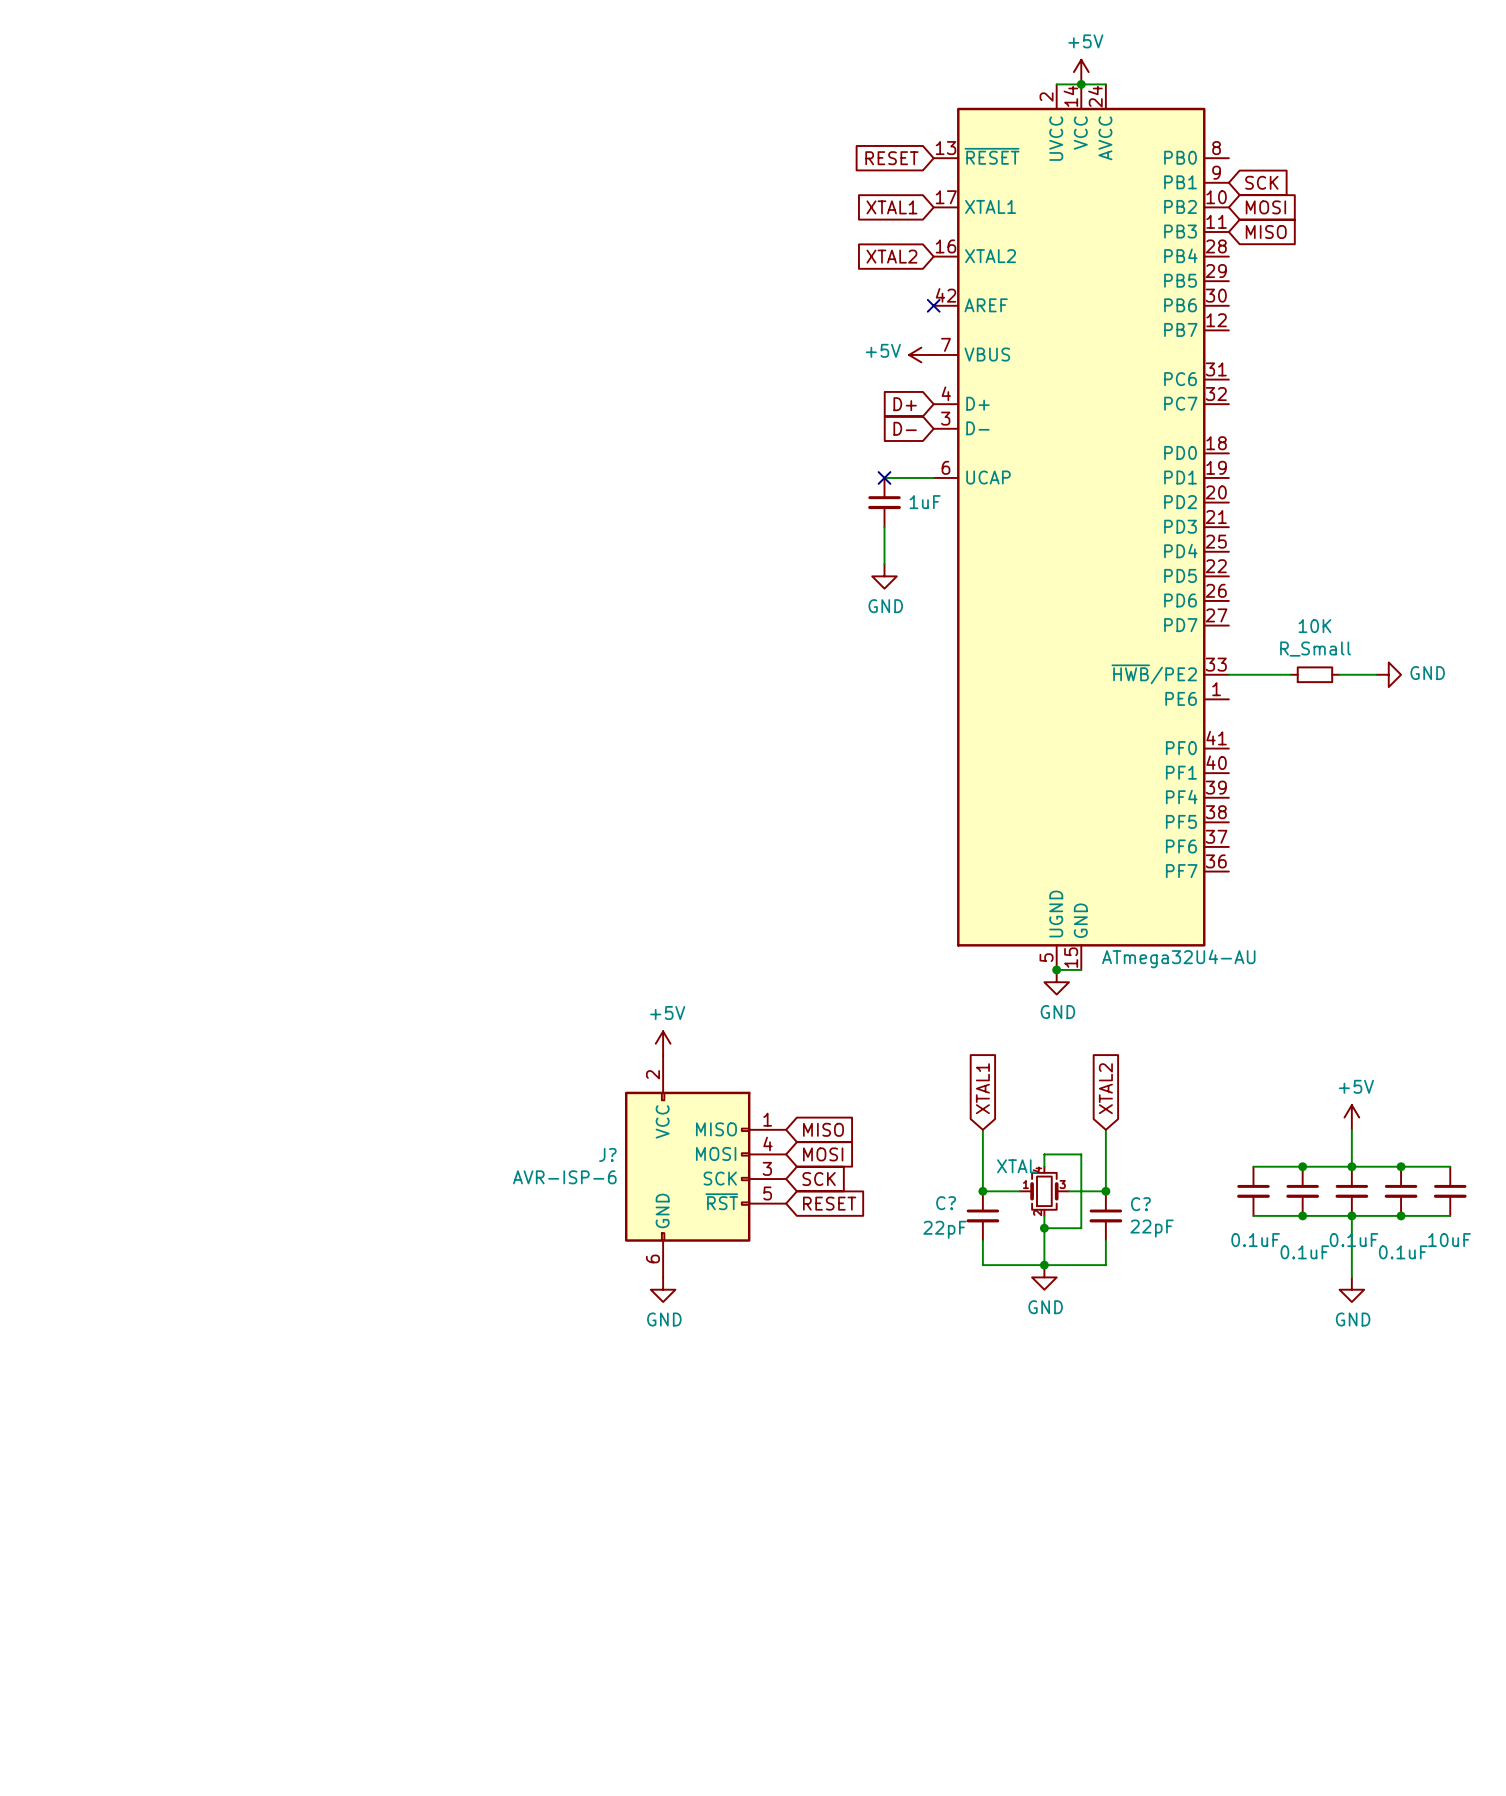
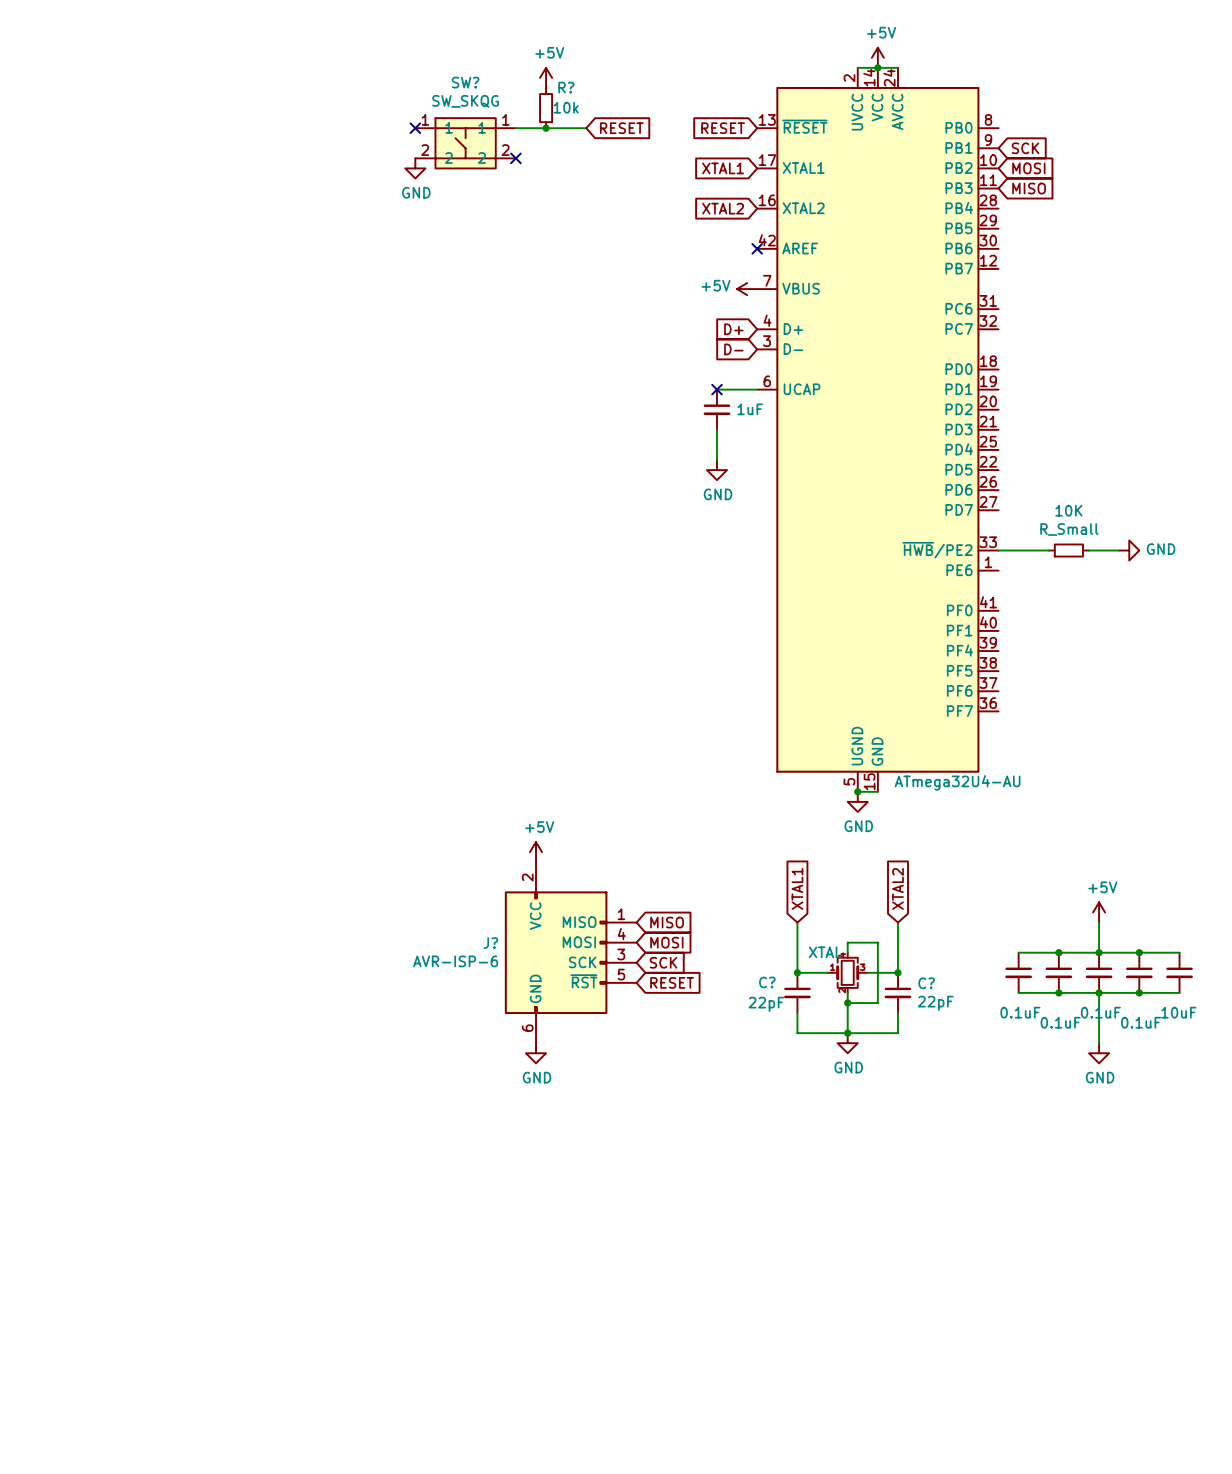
power symbol: none -> +5V (546, 77)
R?: none -> 10k (546, 108)
no-connect mark: none -> (415, 128)
wire: none -> (515, 128) (586, 128)
junction: none -> (546, 128)
global label: none -> RESET (621, 128)
SW?: none -> SW_SKQG (465, 143)
no-connect mark: none -> (515, 158)
power symbol: none -> GND (415, 168)

